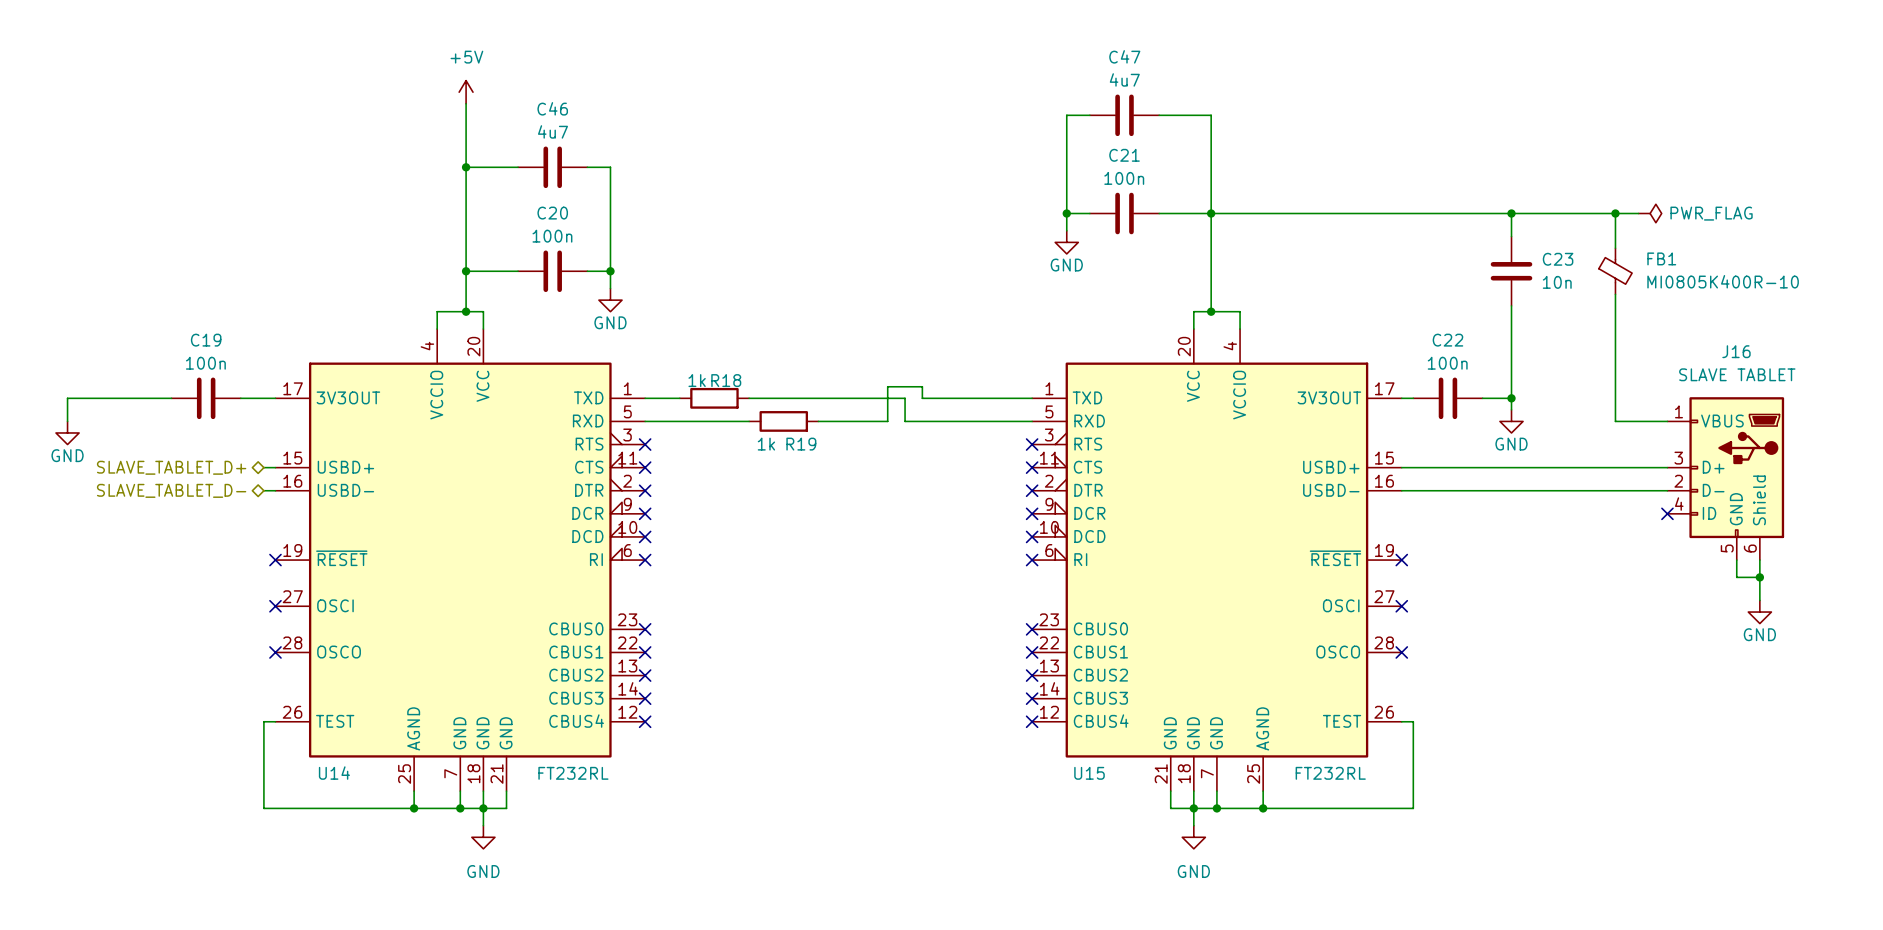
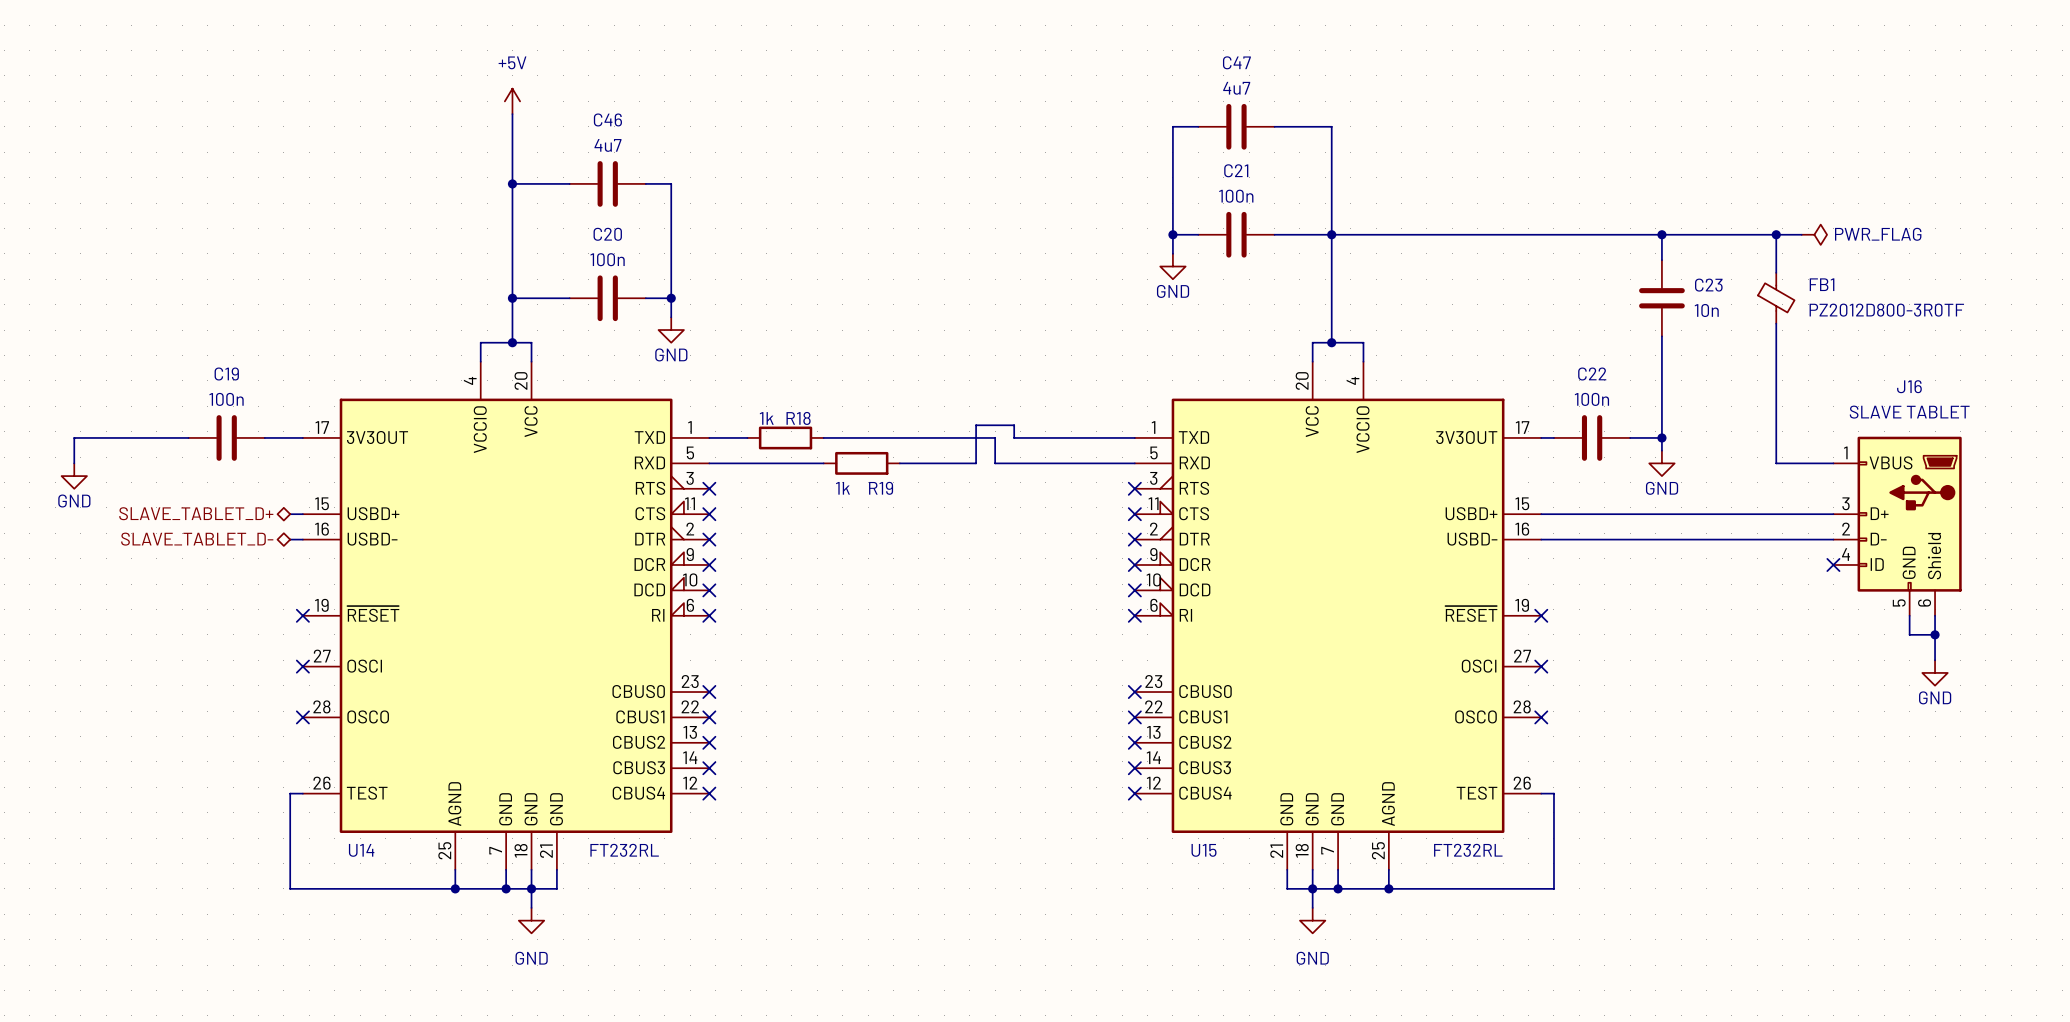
FB1 value: MI0805K400R-10 (1723, 281) -> PZ2012D800-3R0TF (1886, 310)

